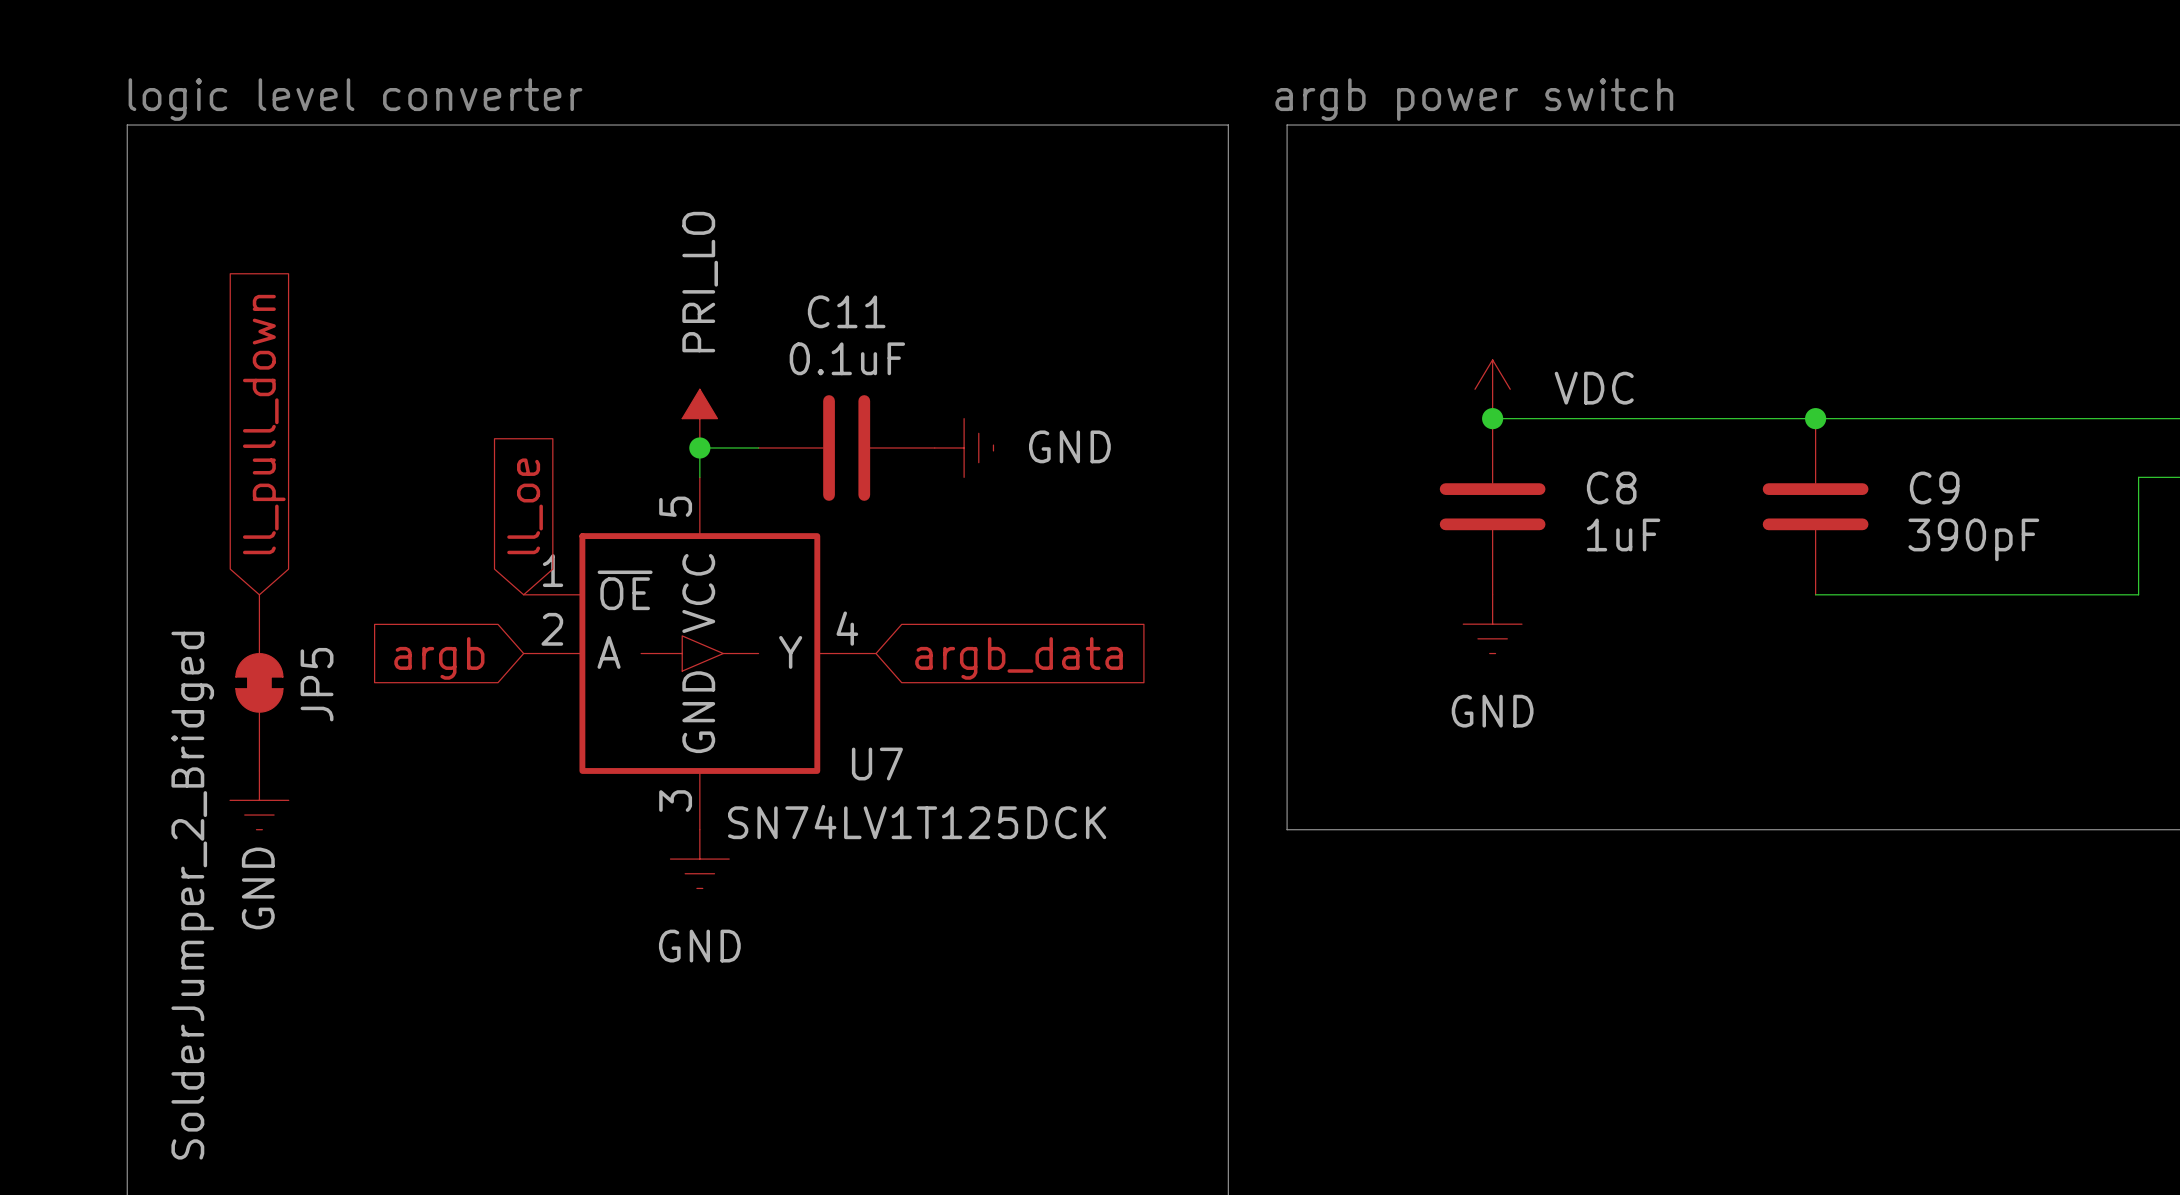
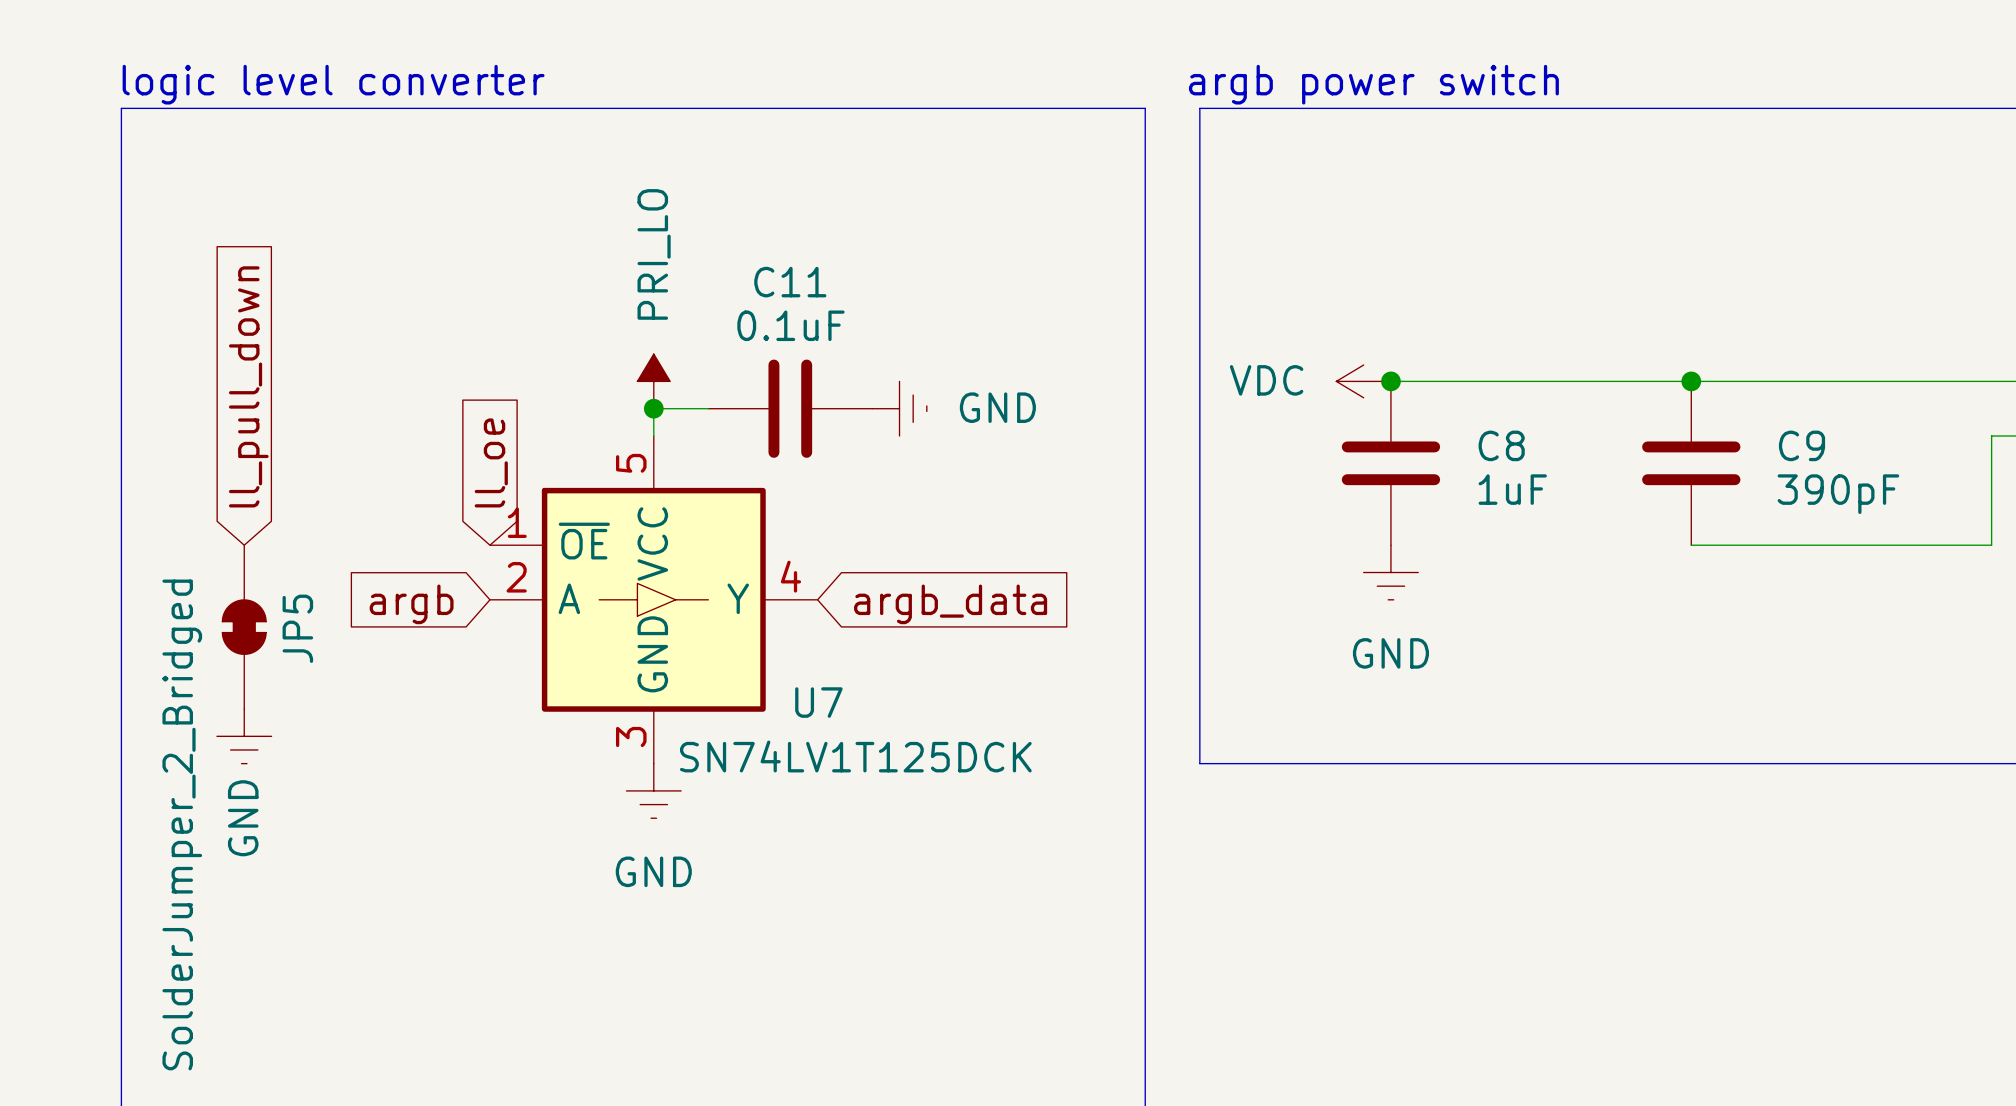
power symbol text position: VDC (1594, 388) -> VDC (1266, 380)
power symbol rotation: 0° (1492, 389) -> 90° counterclockwise (1363, 381)
power symbol position: VDC (1492, 389) -> VDC (1363, 381)

